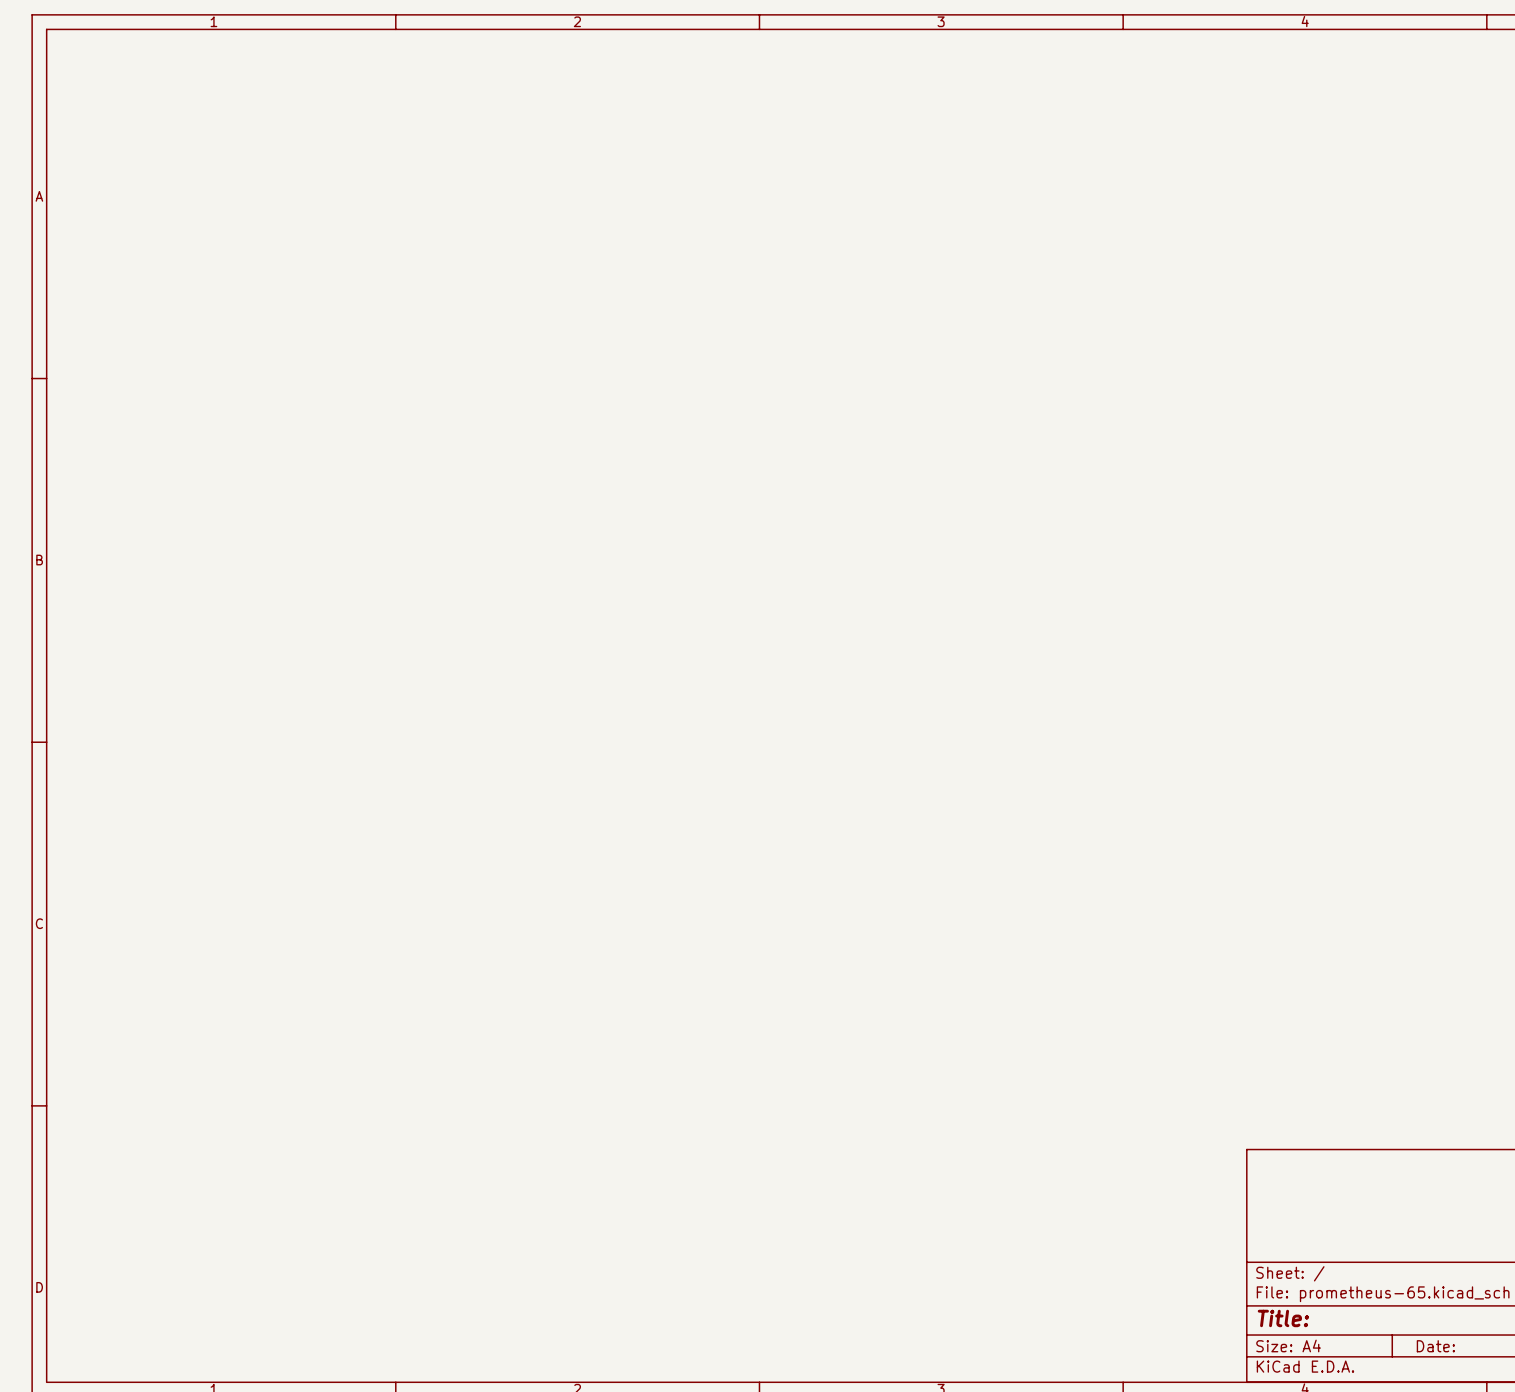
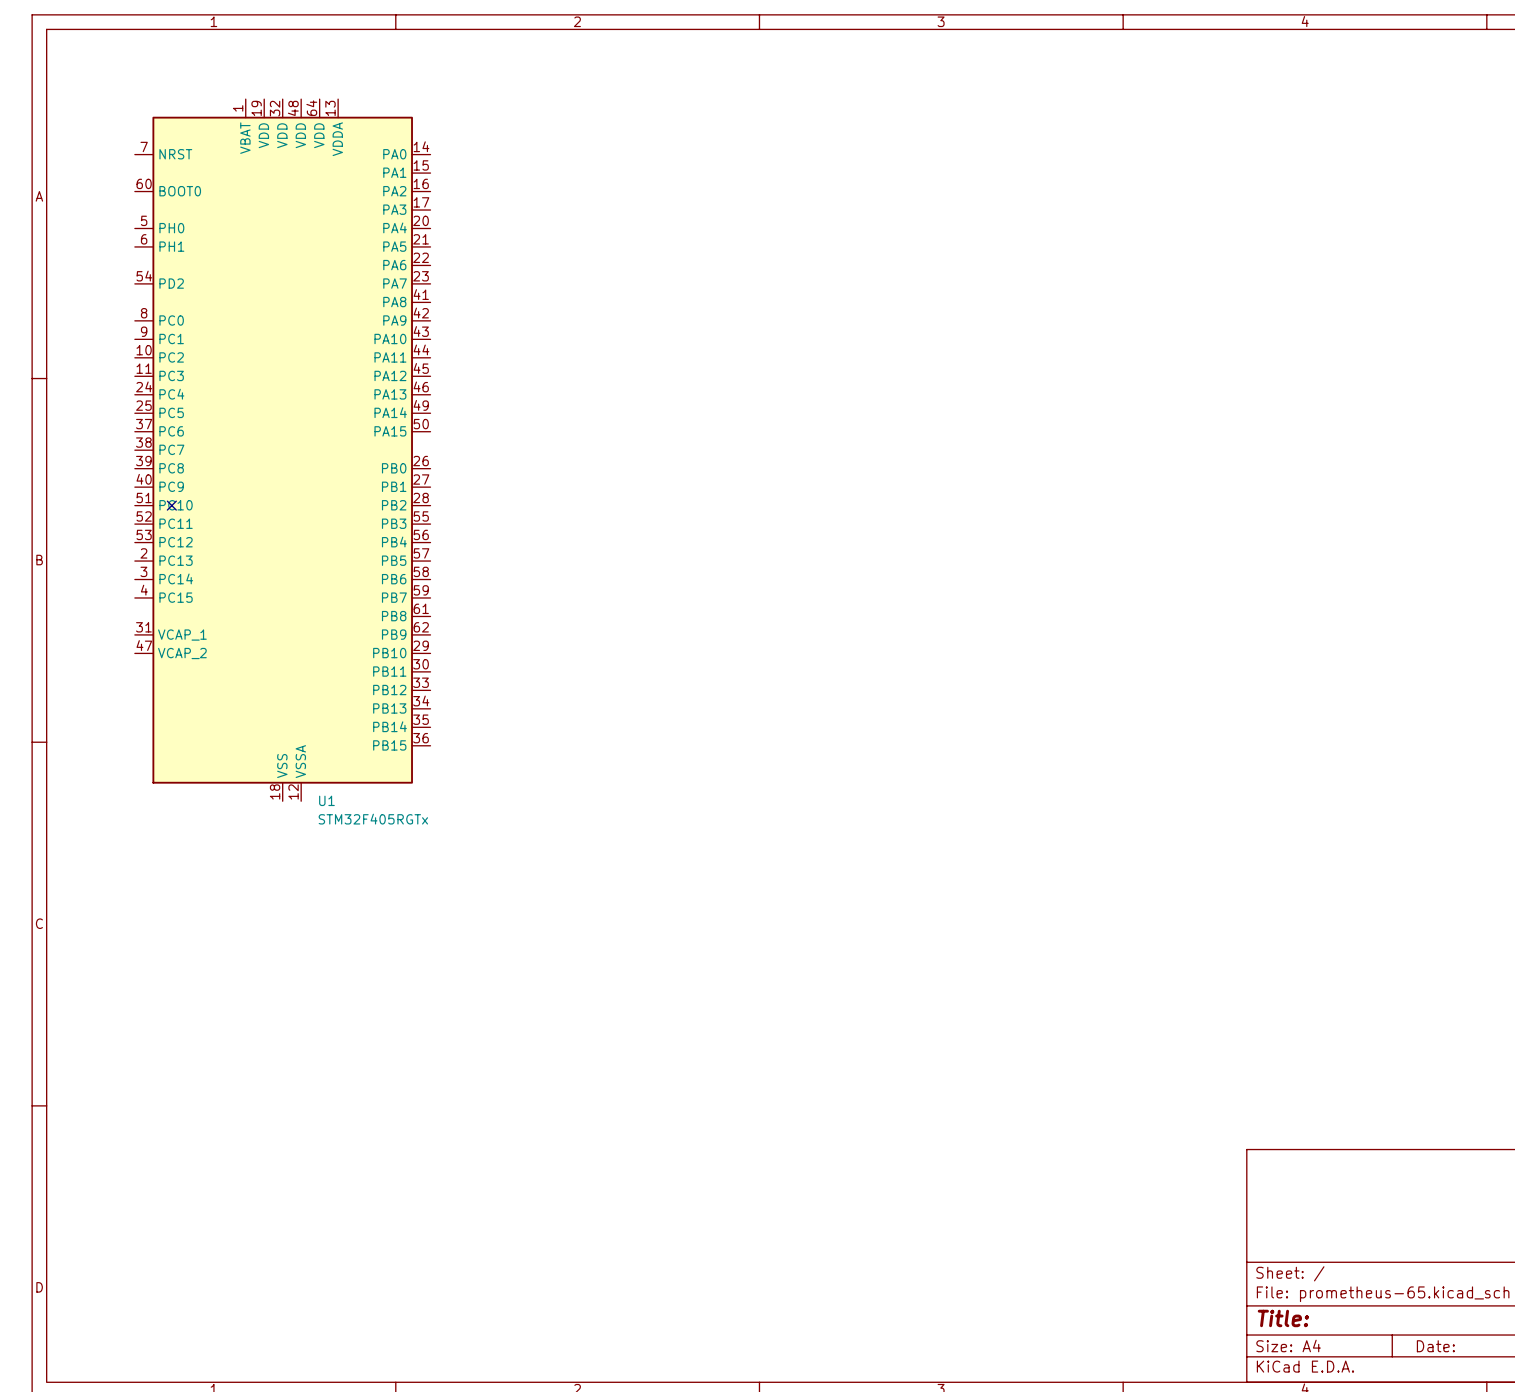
U1: none -> STM32F405RGTx (282, 450)
no-connect mark: none -> (171, 505)

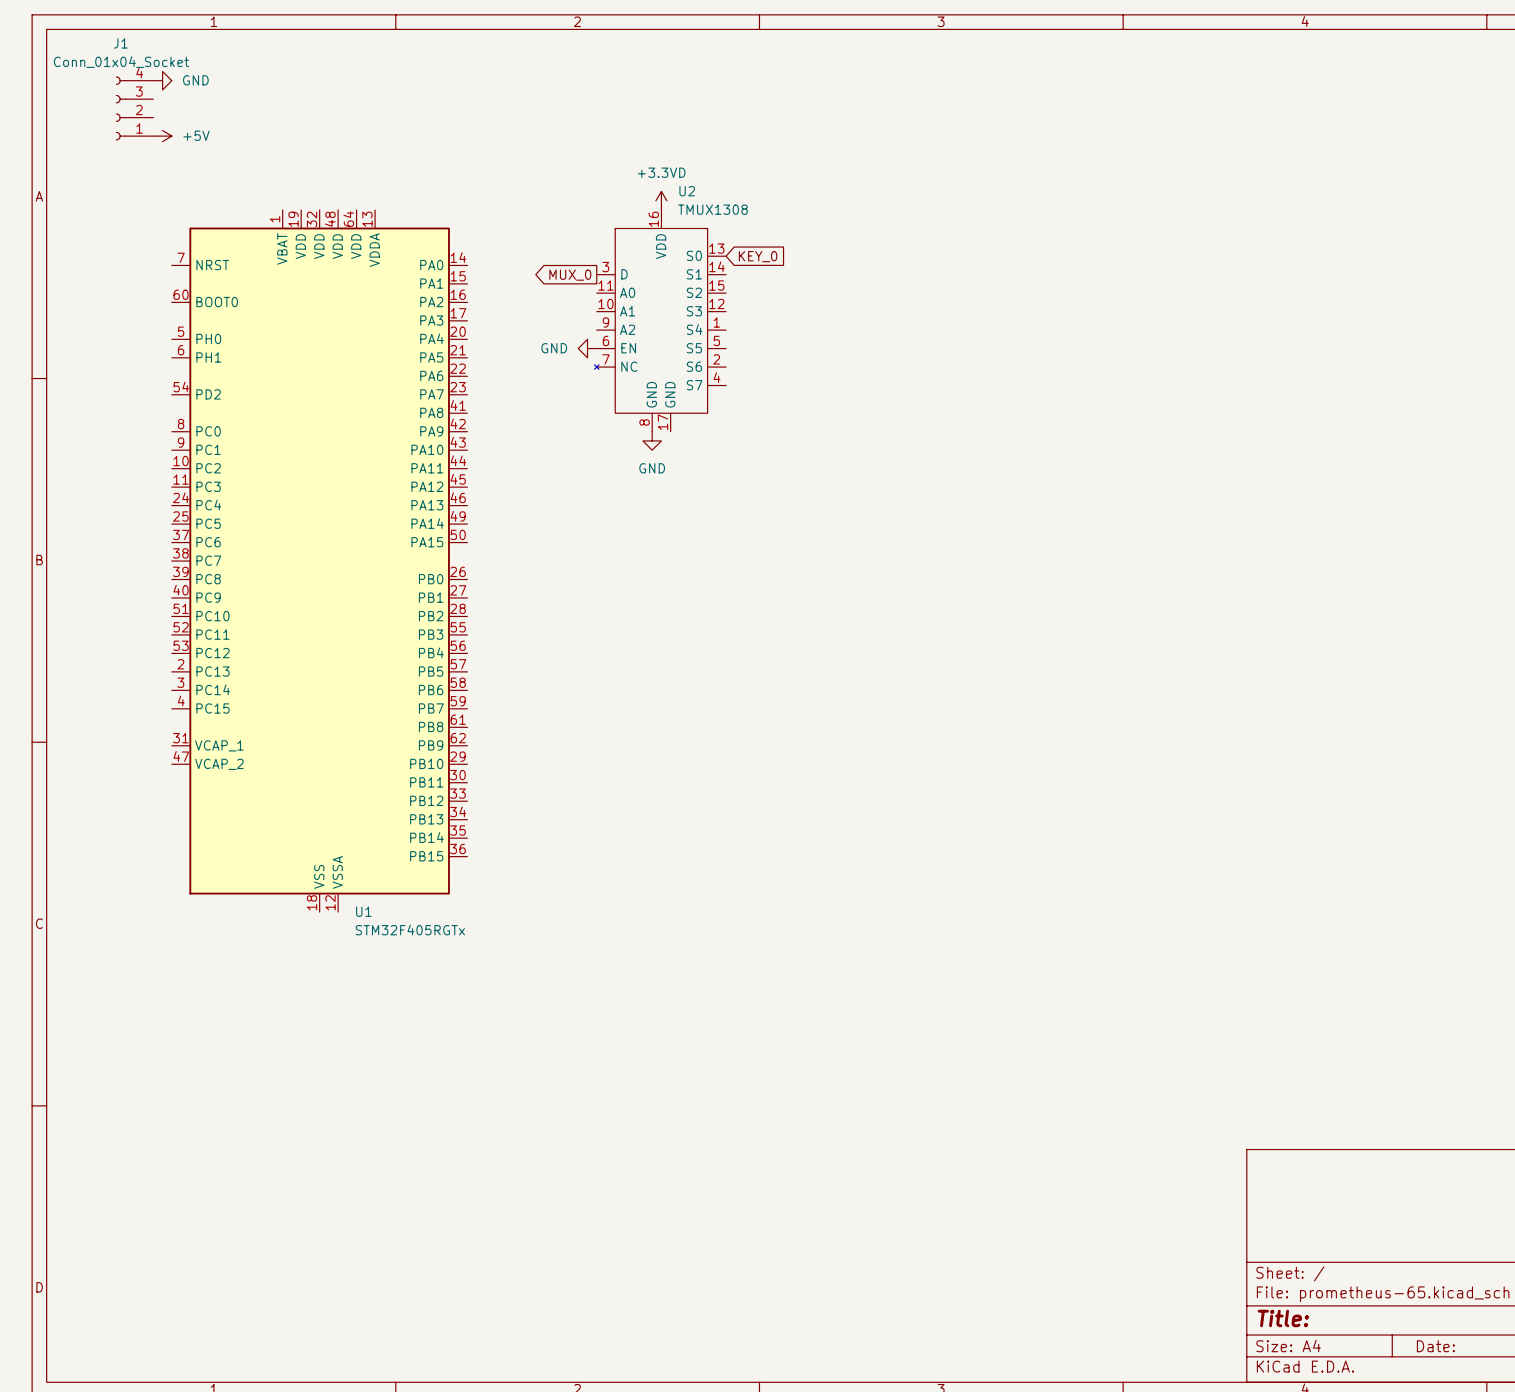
power symbol: none -> GND (162, 80)
J1: none -> Conn_01x04_Socket (134, 108)
power symbol: none -> +5V (162, 136)
power symbol: none -> +3.3VD (661, 200)
global label: none -> KEY_0 (758, 256)
global label: none -> MUX_0 (570, 275)
U2: none -> TMUX1308 (660, 320)
power symbol: none -> GND (587, 348)
power symbol: none -> GND (652, 440)
U1 position: (282, 450) -> (319, 561)
no-connect mark: (171, 505) -> none

